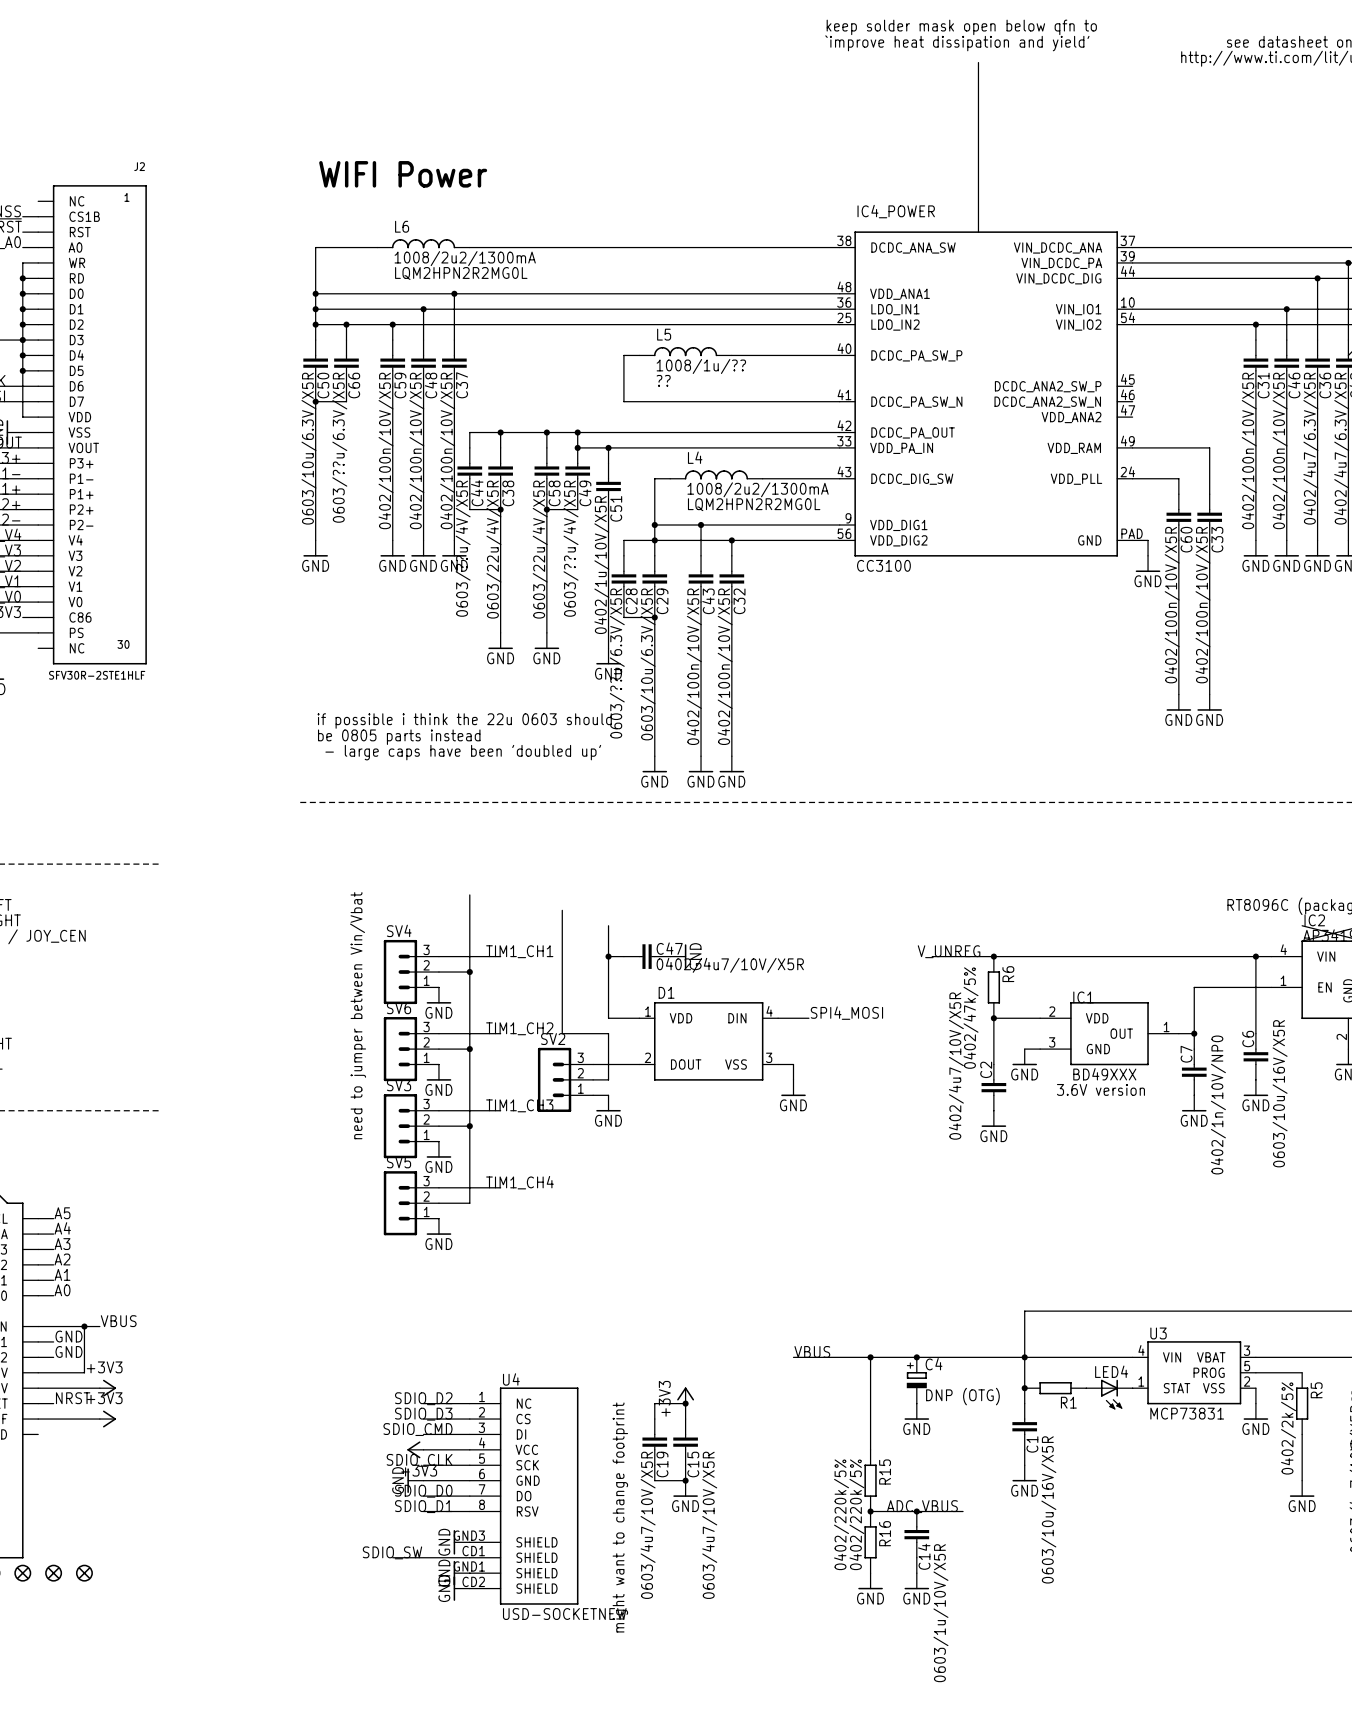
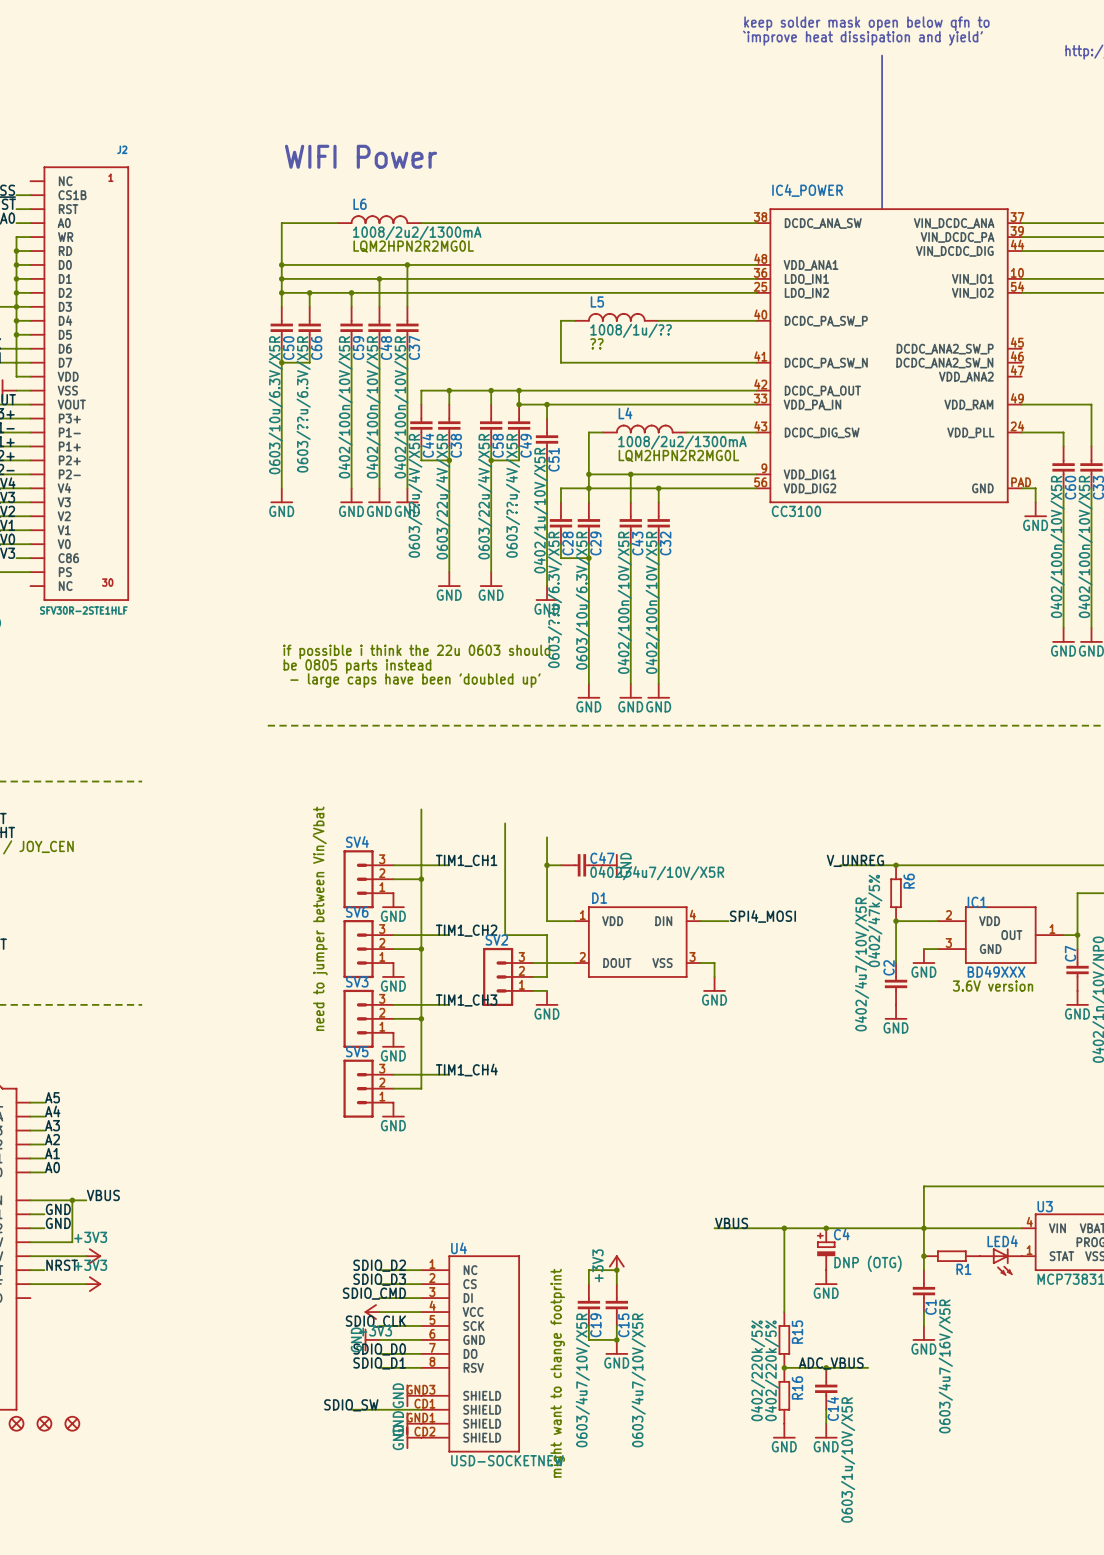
C1 value: 0603/10u/16V/X5R (1048, 1509) -> 0603/4u7/16V/X5R (945, 1366)

